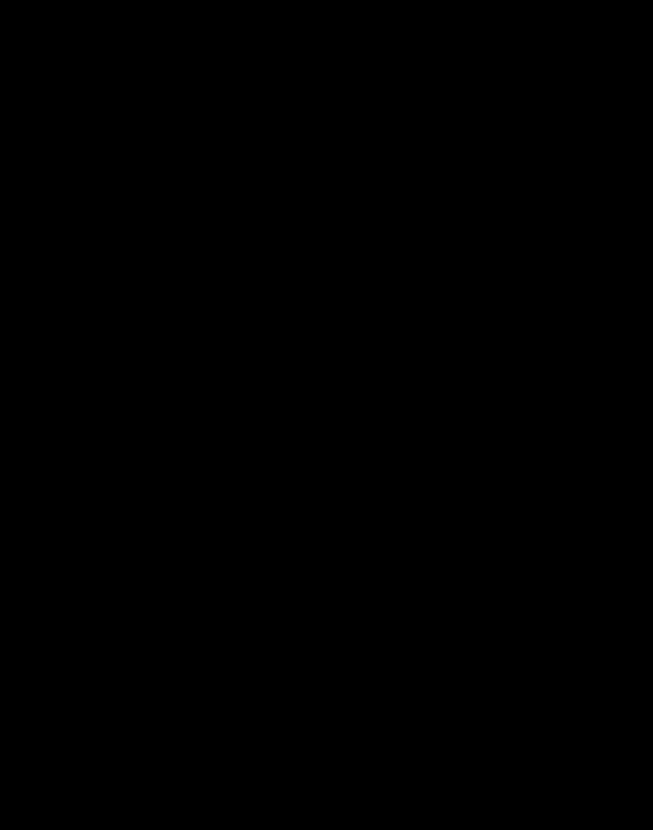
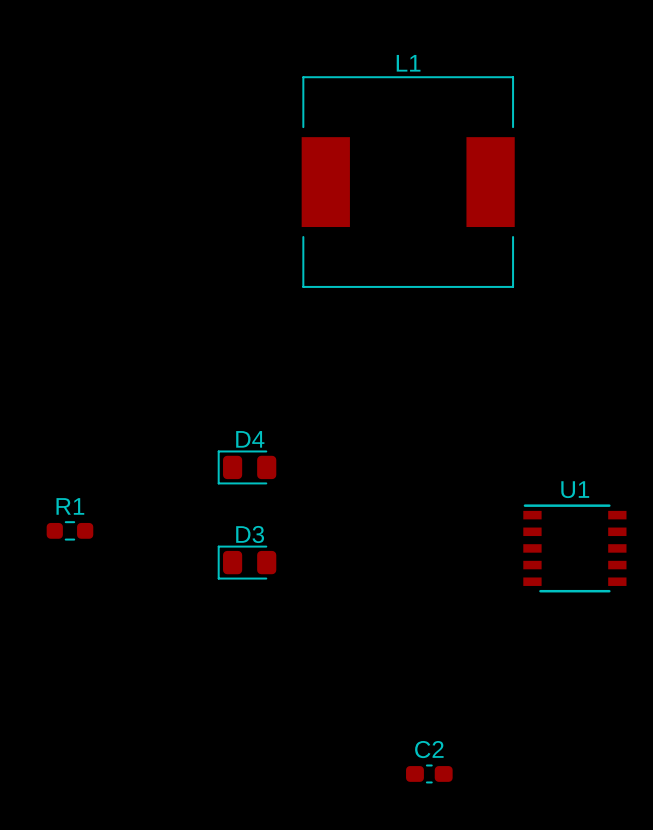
L1: none -> (408, 182)
D4: none -> (246, 467)
R1: none -> (69, 530)
U1: none -> (574, 548)
D3: none -> (246, 562)
C2: none -> (429, 773)

